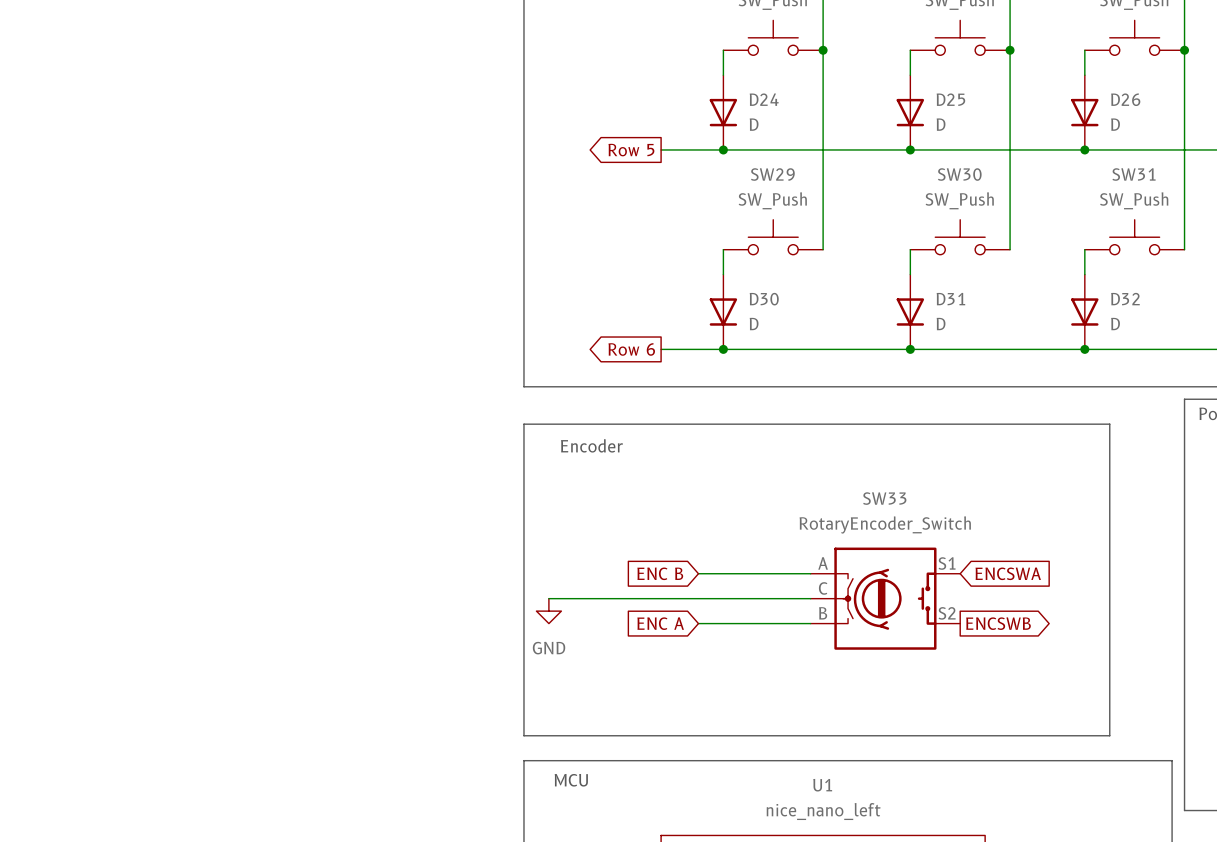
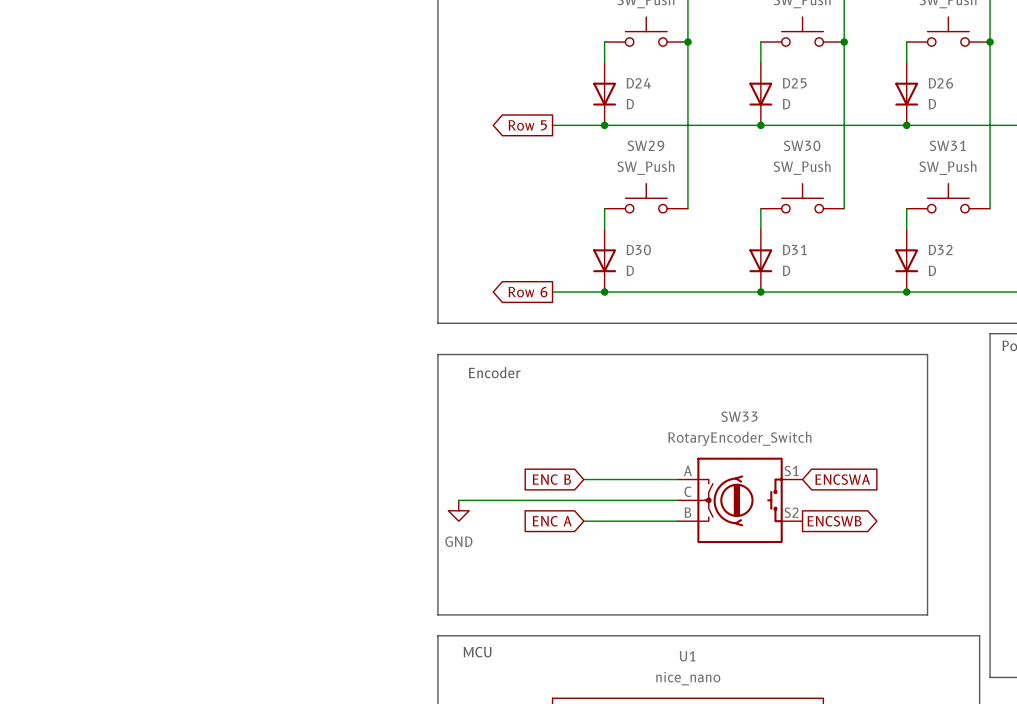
U1 value: nice_nano_left (823, 811) -> nice_nano (688, 678)

